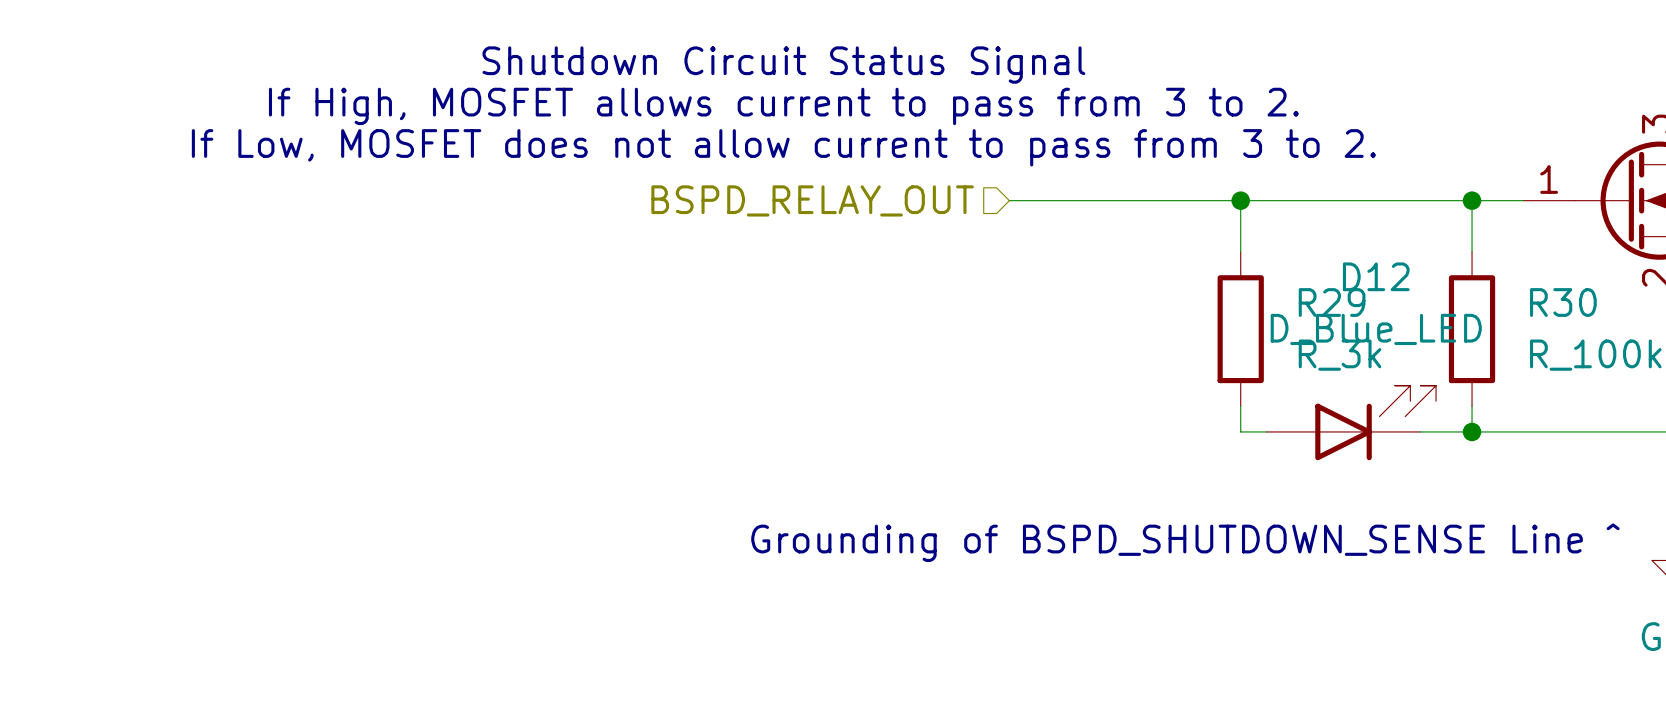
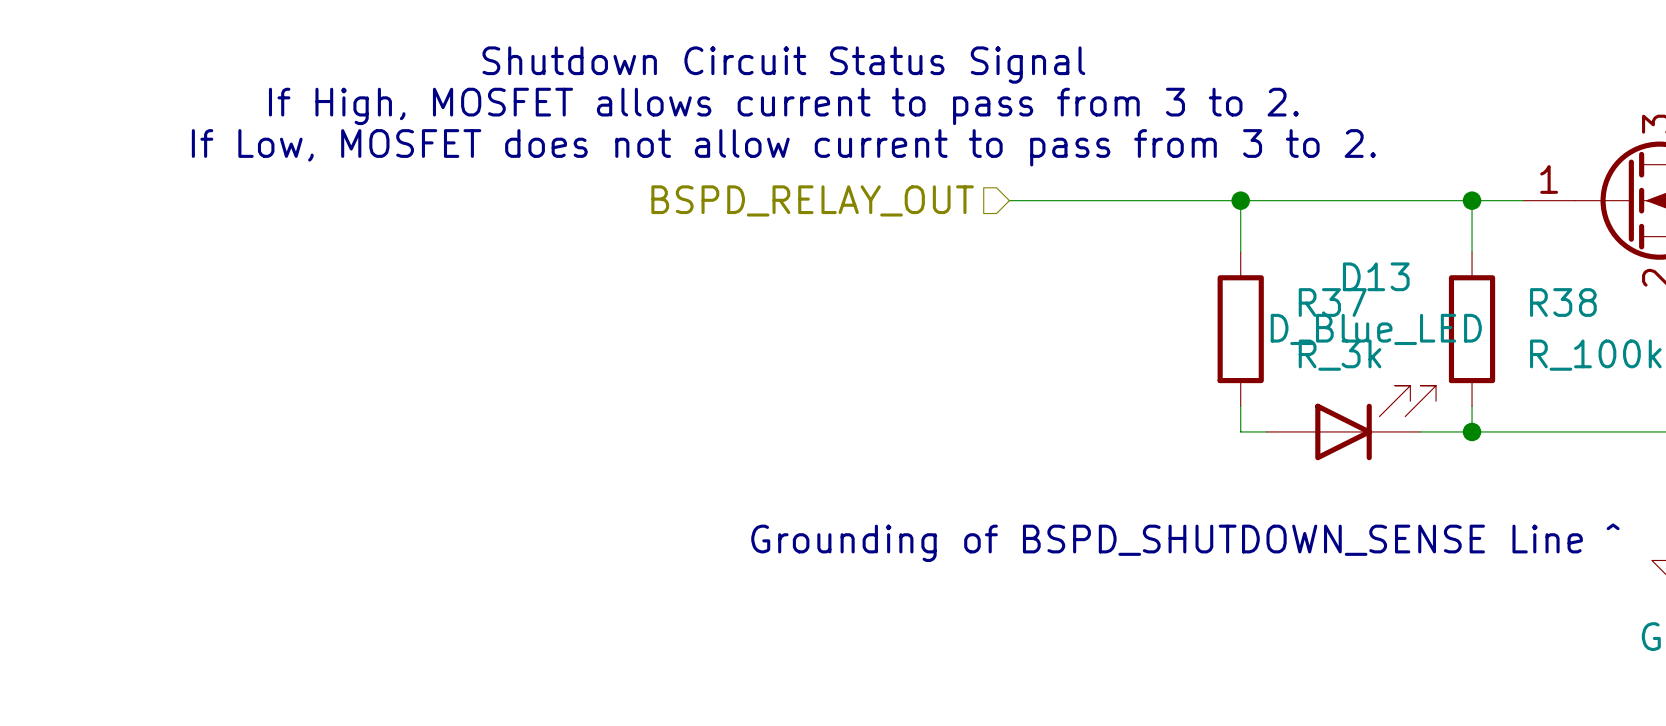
D12 name: D12 (1376, 276) -> D13 (1376, 276)
R29 name: R29 (1332, 302) -> R37 (1332, 302)
R30 name: R30 (1563, 302) -> R38 (1563, 302)

